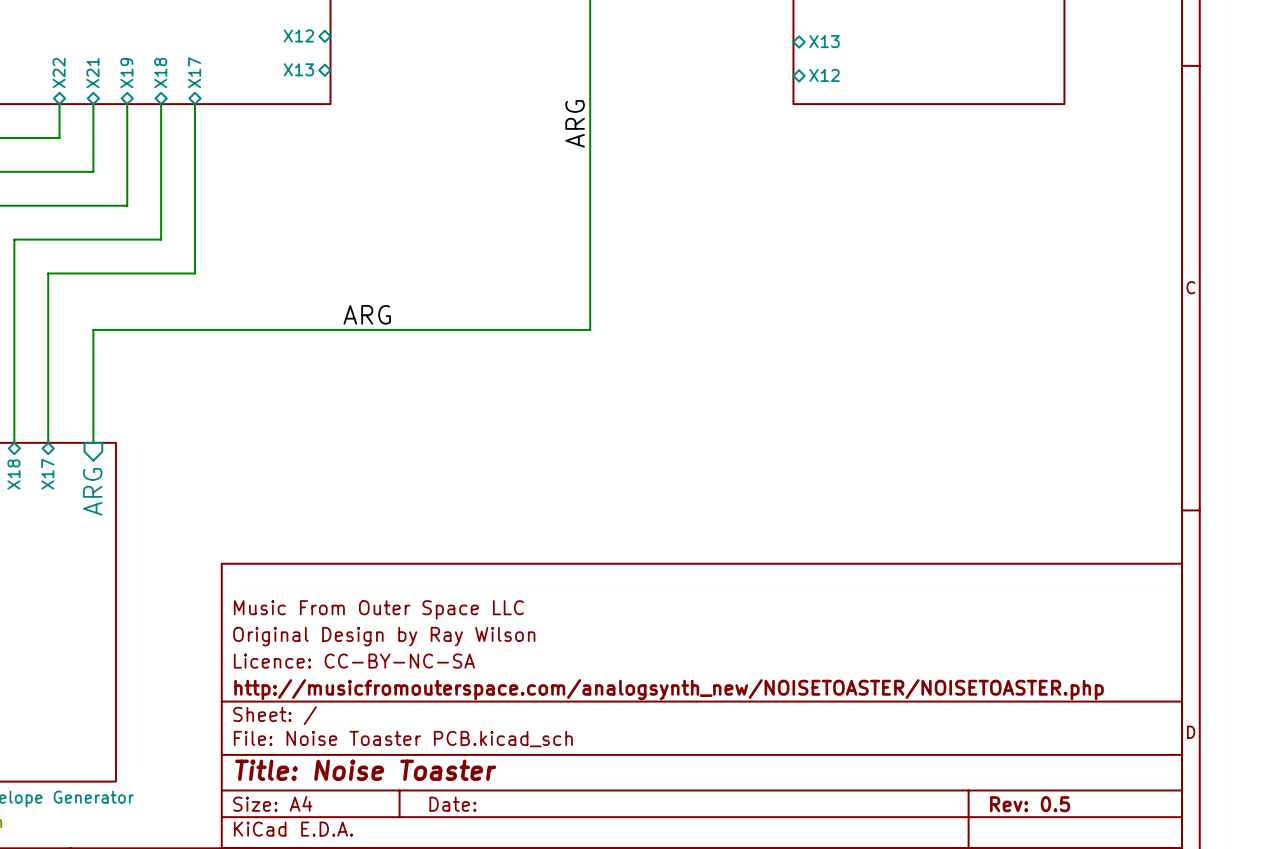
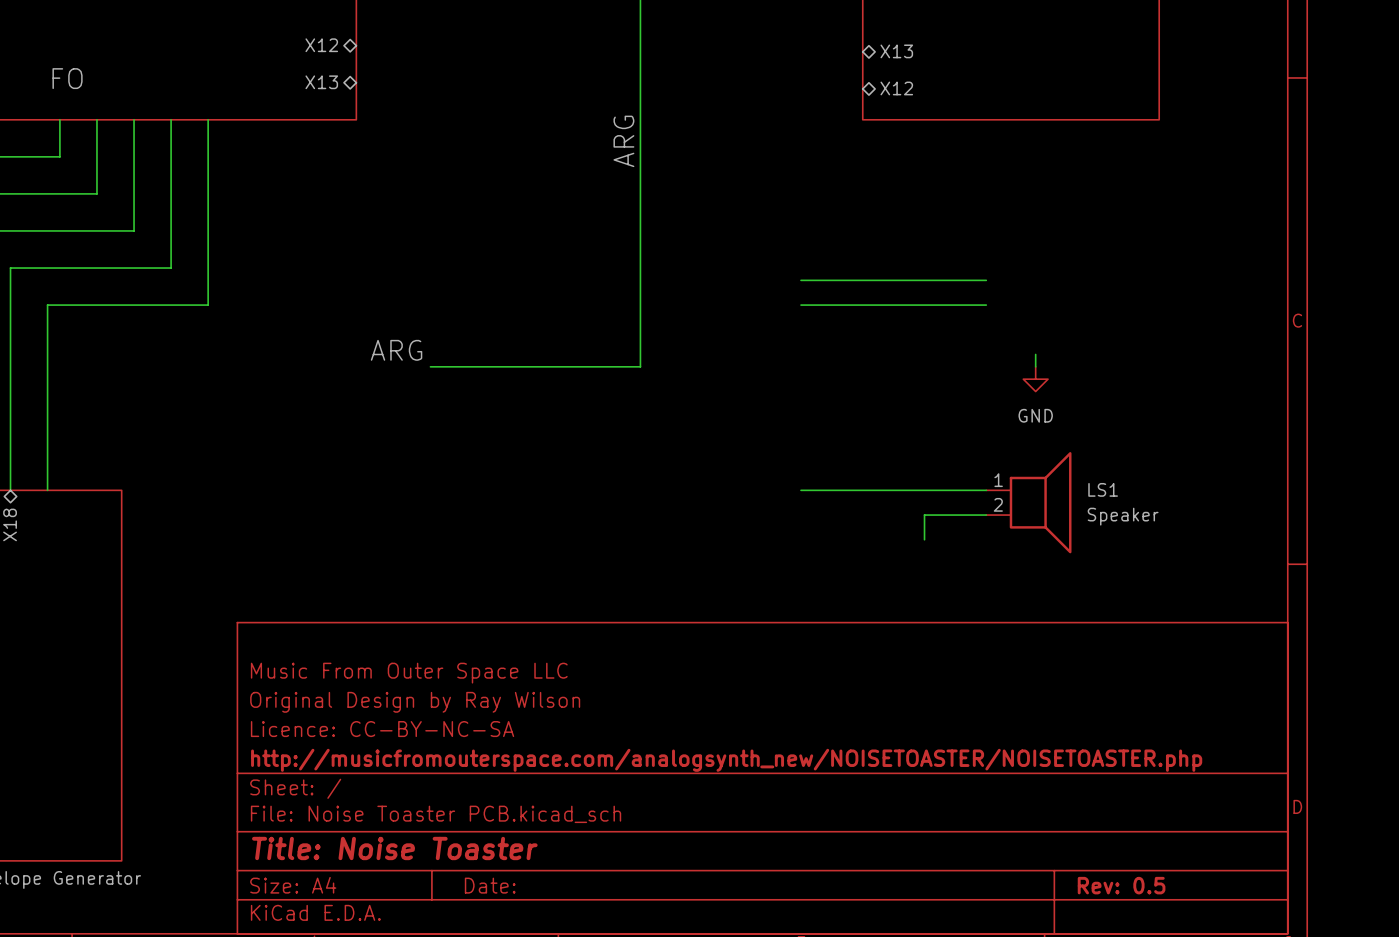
label: none -> FO (67, 78)
sheet pin: X17 (194, 72) -> none
sheet pin: X22 (59, 73) -> none
sheet pin: X21 (92, 73) -> none
sheet pin: X19 (126, 73) -> none
sheet pin: X18 (160, 73) -> none
wire: none -> (801, 280) (986, 280)
wire: none -> (801, 305) (986, 305)
wire: none -> (1035, 354) (1035, 366)
wire: (398, 329) (93, 329) (93, 442) -> none
power symbol: none -> GND (1035, 379)
wire: none -> (801, 490) (986, 490)
LS1: none -> Speaker (1028, 502)
wire: none -> (986, 515) (924, 515) (924, 539)
sheet pin: X17 (47, 474) -> none
sheet pin: ARG (92, 491) -> none

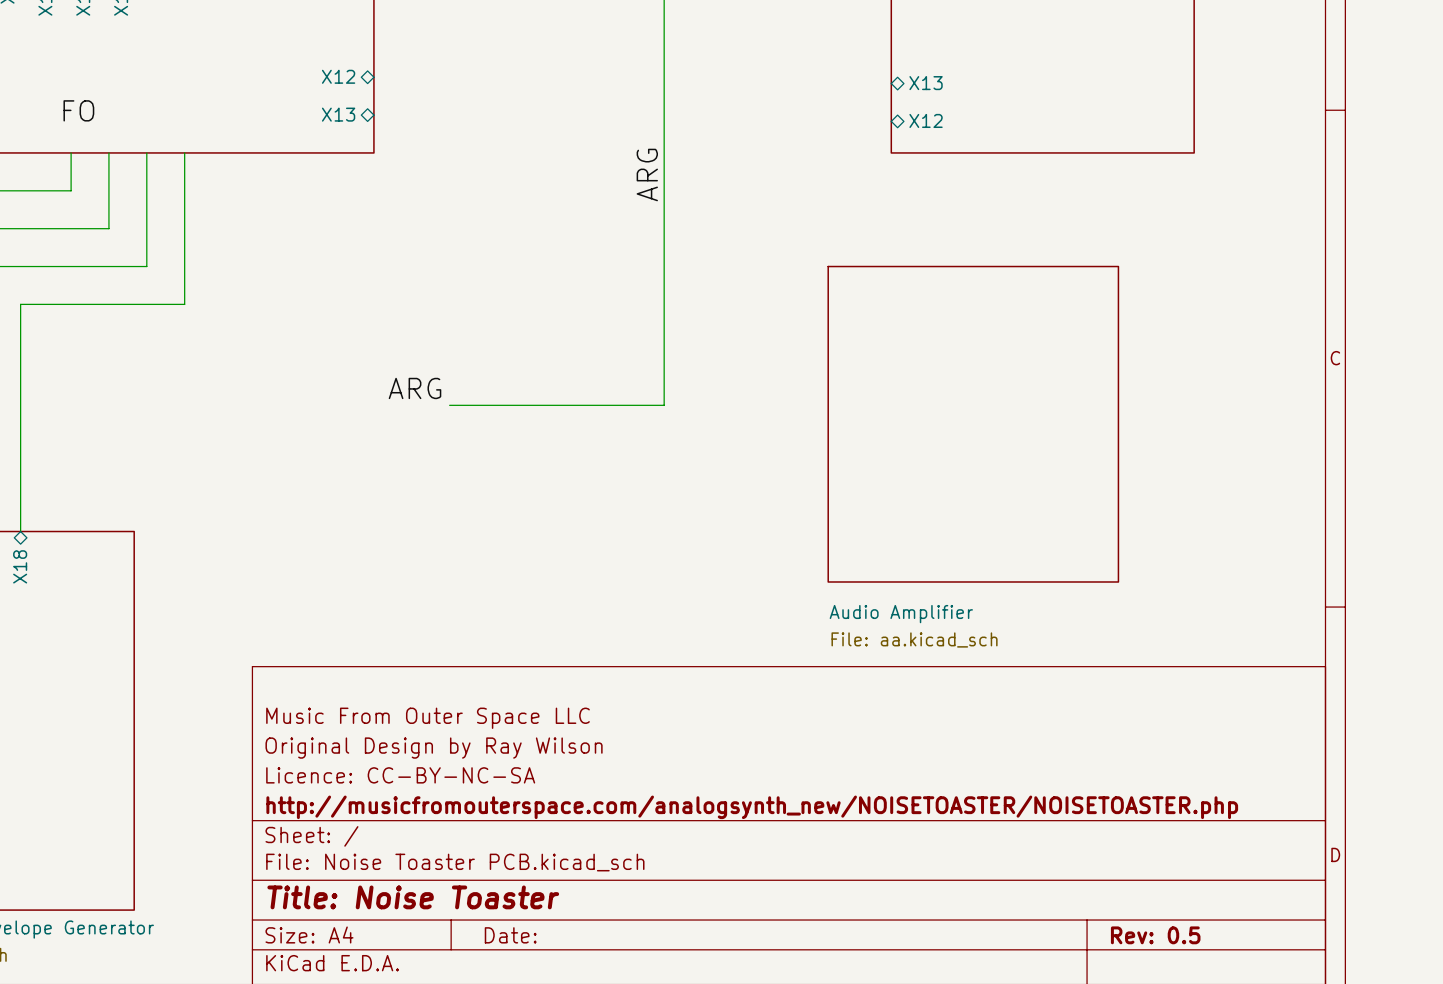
wire: (208, 119) (208, 305) (47, 305) (47, 490) -> none
wire: (801, 280) (986, 280) -> none
wire: (801, 305) (986, 305) -> none
wire: (1035, 354) (1035, 366) -> none
power symbol: GND (1035, 379) -> none
sheet Audio Amplifier: none -> File: aa.kicad_sch (973, 424)
wire: (801, 490) (986, 490) -> none
LS1: Speaker (1028, 502) -> none
wire: (986, 515) (924, 515) (924, 539) -> none

